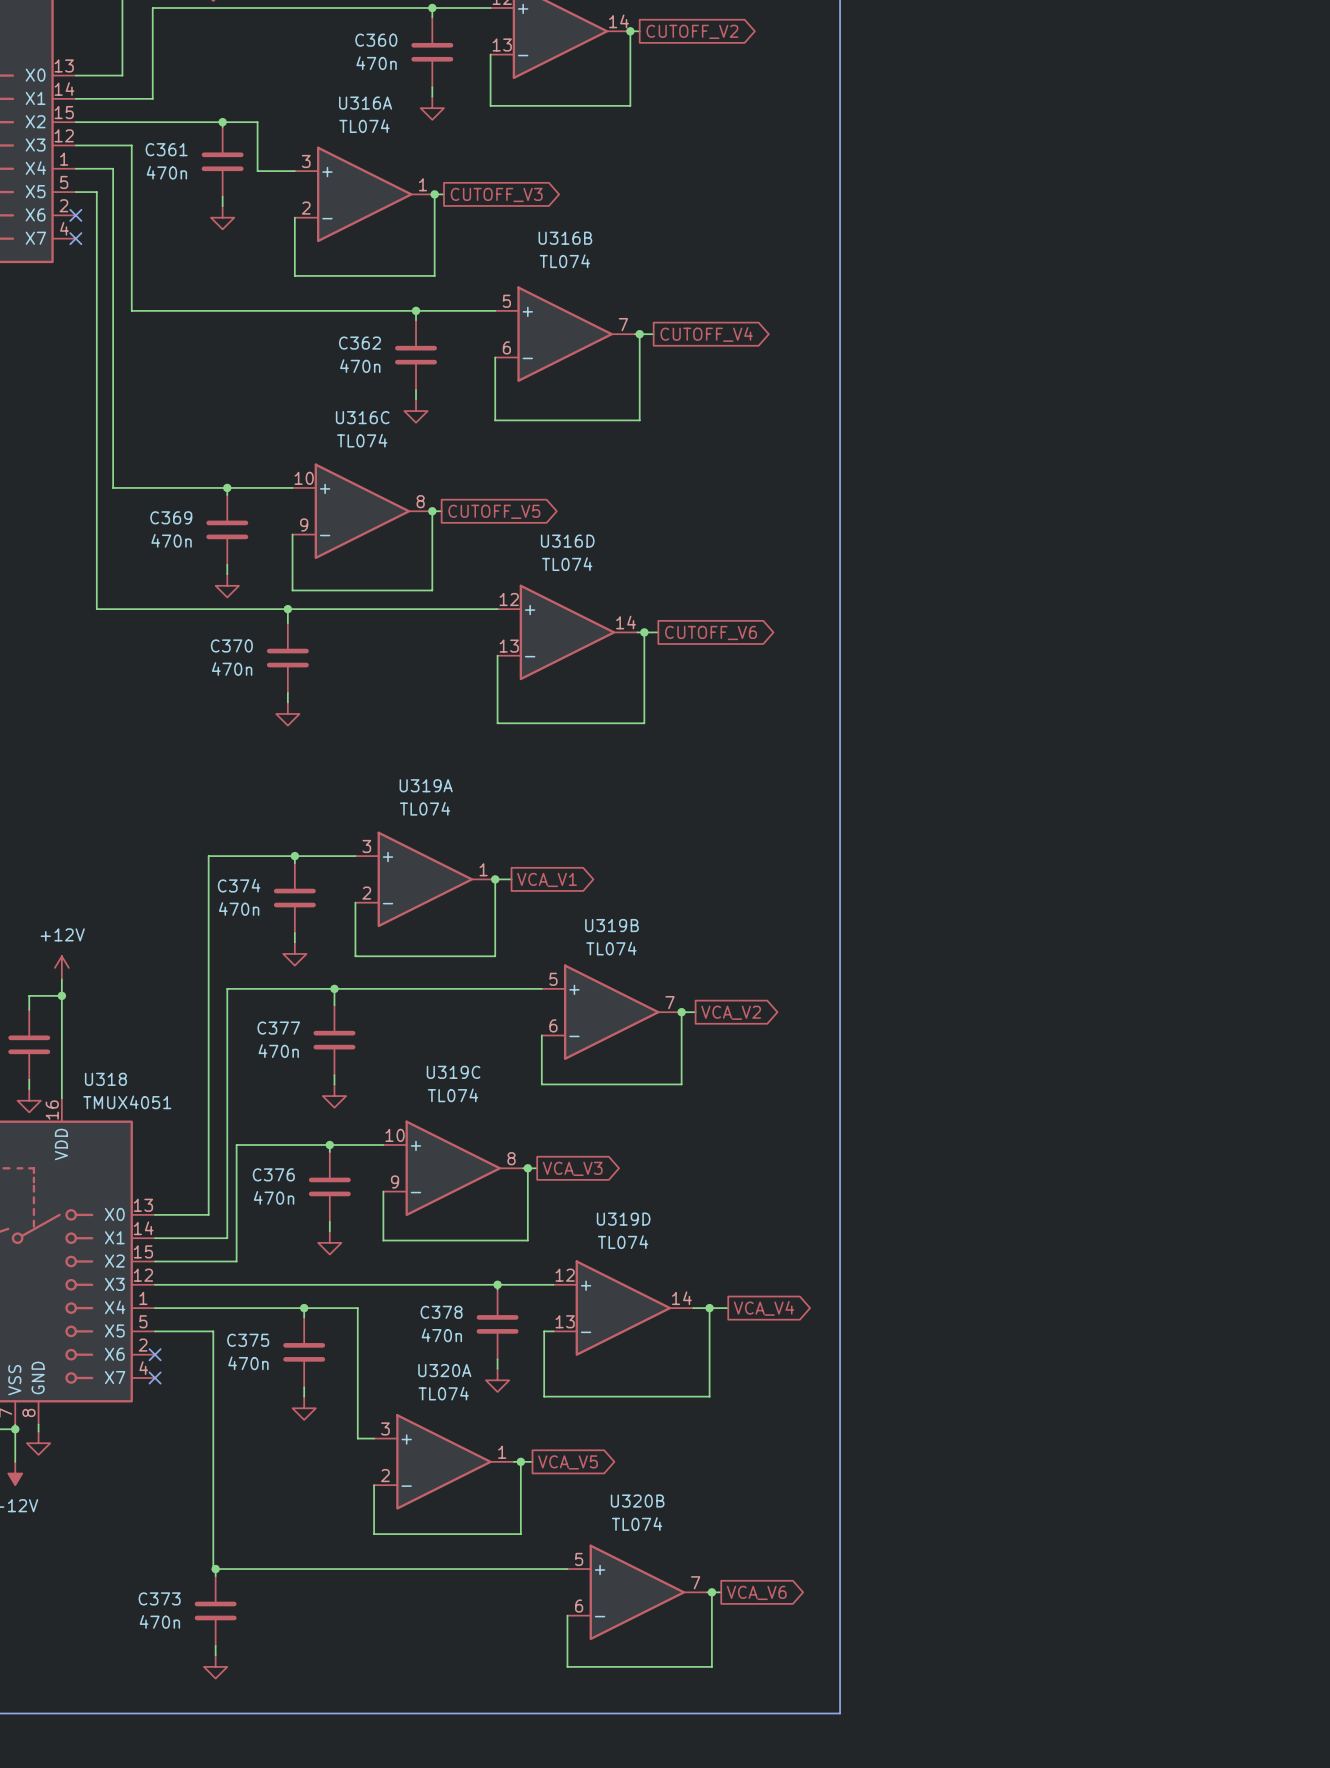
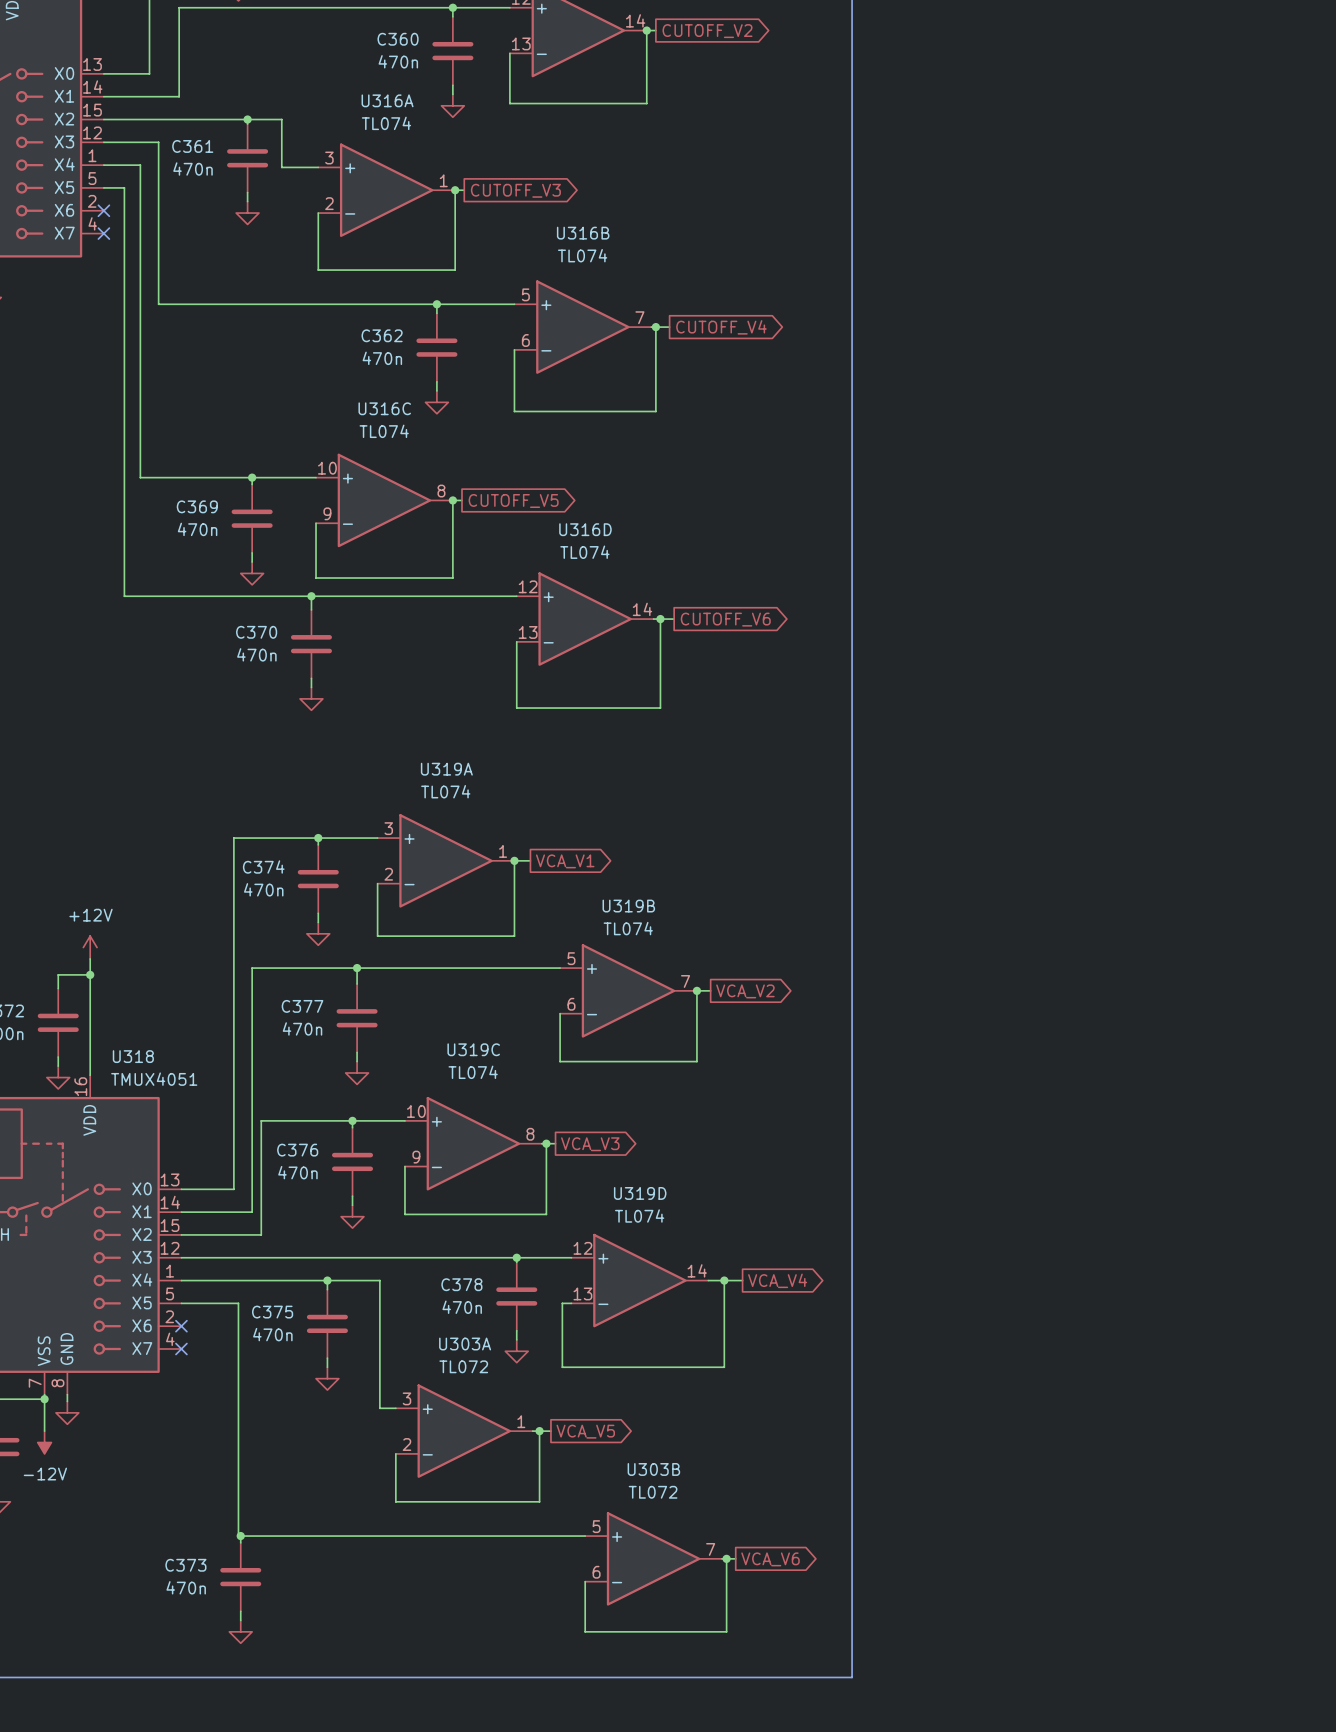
U320A name: U320A (444, 1370) -> U303A (465, 1344)
U320A value: TL074 (443, 1393) -> TL072 (463, 1366)
U320B name: U320B (637, 1501) -> U303B (653, 1469)
U320B value: TL074 (637, 1524) -> TL072 (653, 1492)

